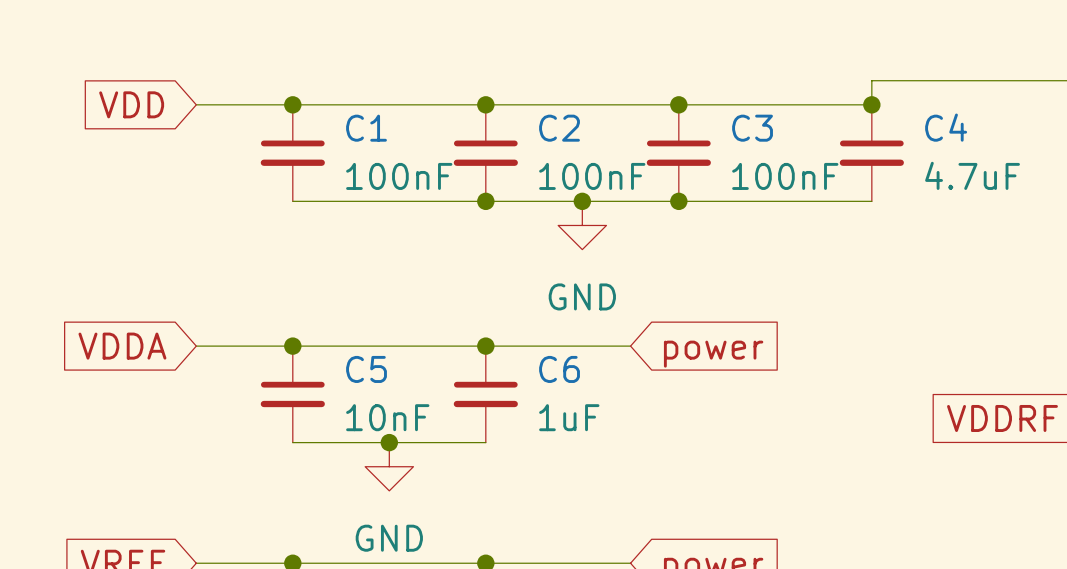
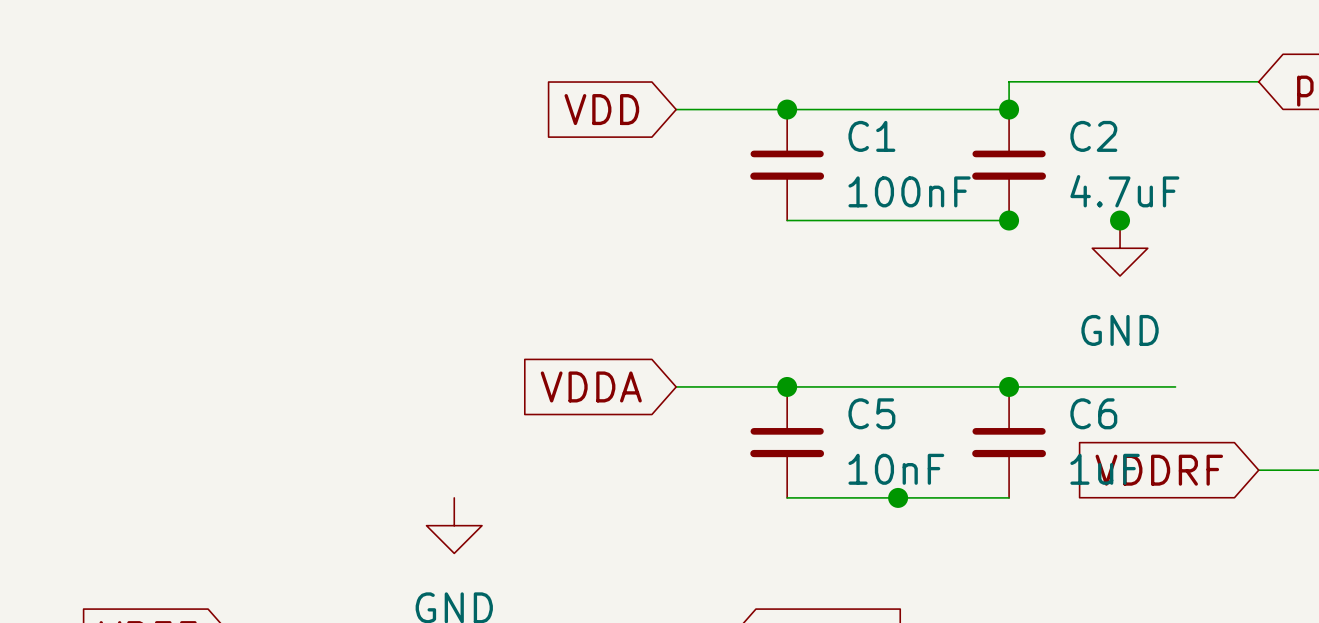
global label position: VDD (131, 104) -> VDD (601, 109)
wire: (196, 104) (582, 104) -> none
junction: (292, 104) -> none
junction: (485, 104) -> none
C4 name: C4 (946, 127) -> C2 (1093, 136)
C3 name: C3 (752, 128) -> C1 (871, 136)
C1: 100nF (292, 153) -> none
C2: 100nF (485, 153) -> none
wire: (292, 201) (678, 201) -> none
junction: (485, 201) -> none
junction: (582, 201) -> none
junction: (678, 201) -> none
junction: none -> (1009, 220)
junction: none -> (1120, 220)
power symbol: GND (582, 225) -> none
power symbol: none -> GND (1120, 248)
global label position: VDDA (122, 346) -> VDDA (591, 386)
wire: (196, 346) (582, 346) -> (731, 386) (1175, 386)
junction: (292, 346) -> none
junction: (485, 346) -> none
junction: none -> (787, 386)
junction: none -> (1009, 386)
global label: power (713, 354) -> none
C5 position: (292, 394) -> (787, 442)
C6 position: (485, 394) -> (1009, 442)
wire: (292, 442) (485, 442) -> (787, 497) (1009, 497)
junction: (389, 442) -> none
junction: none -> (898, 497)

